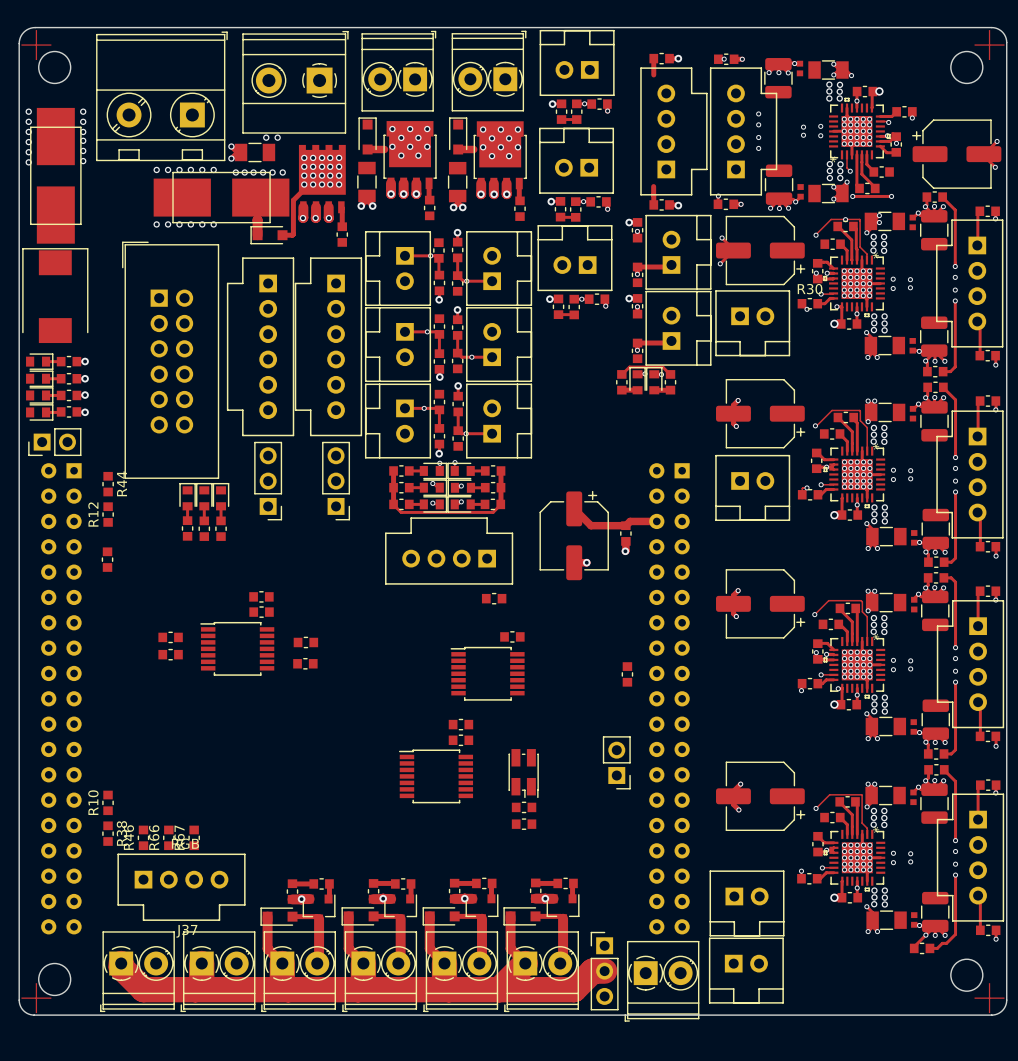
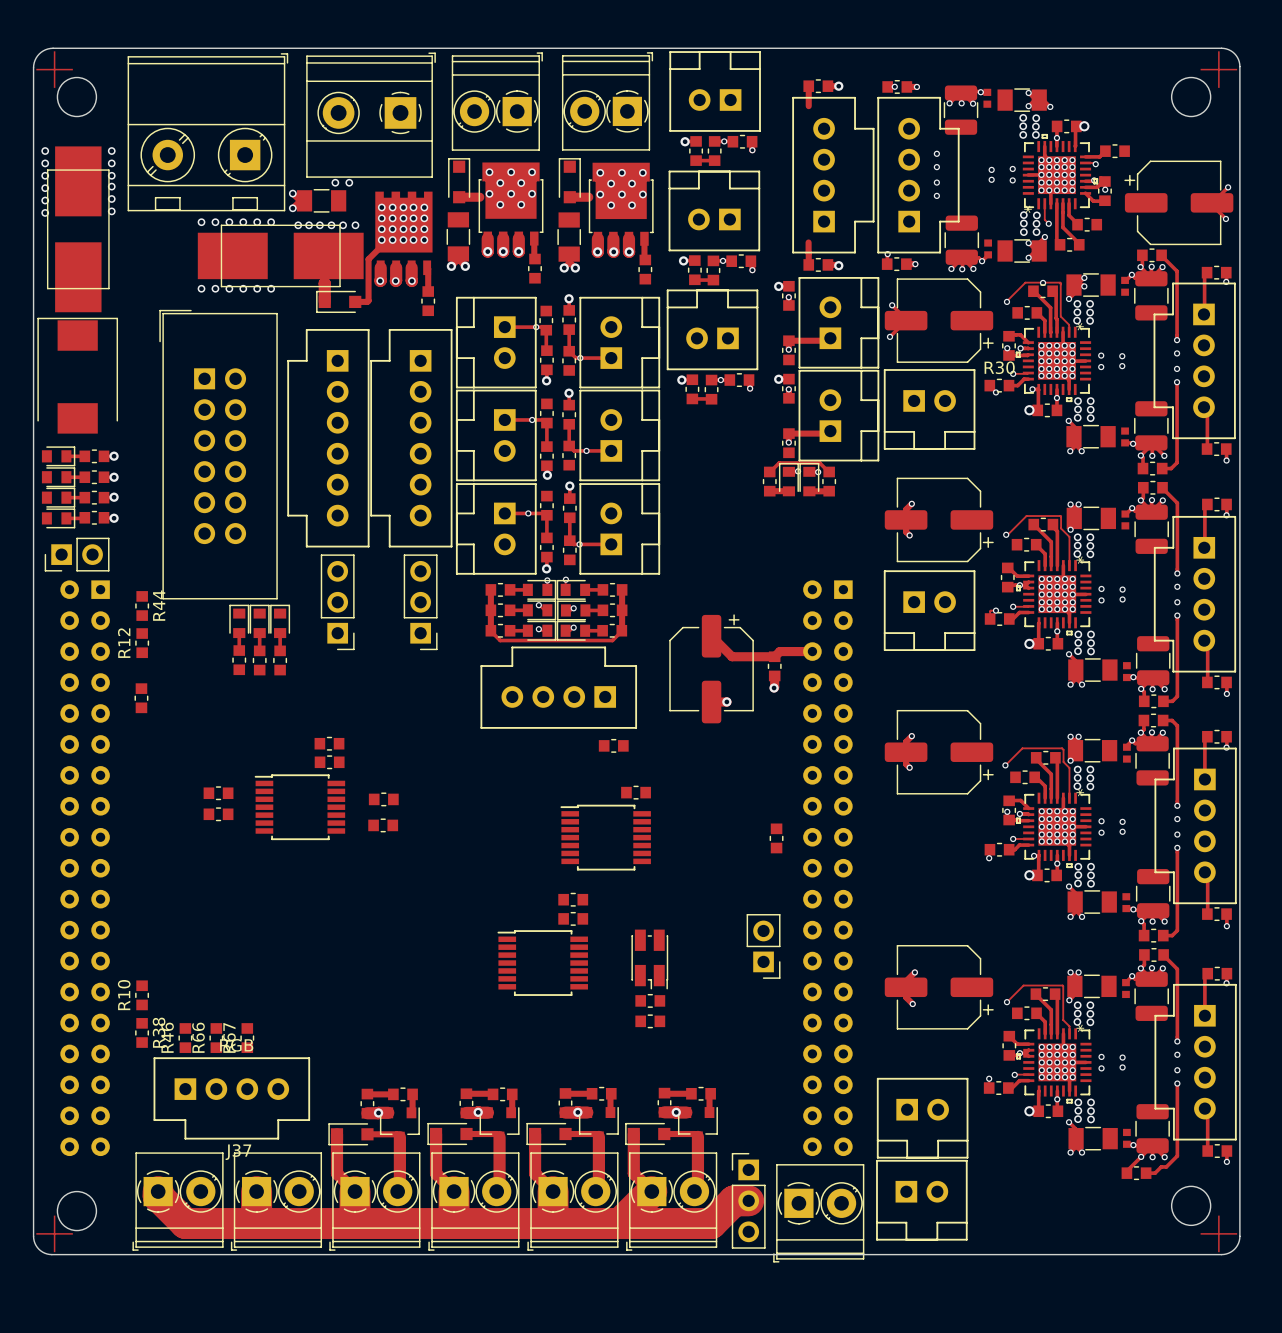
via: (912, 118) -> none
track: (852, 196) (891, 196) -> none
via: (852, 196) -> none
via: (891, 196) -> none

